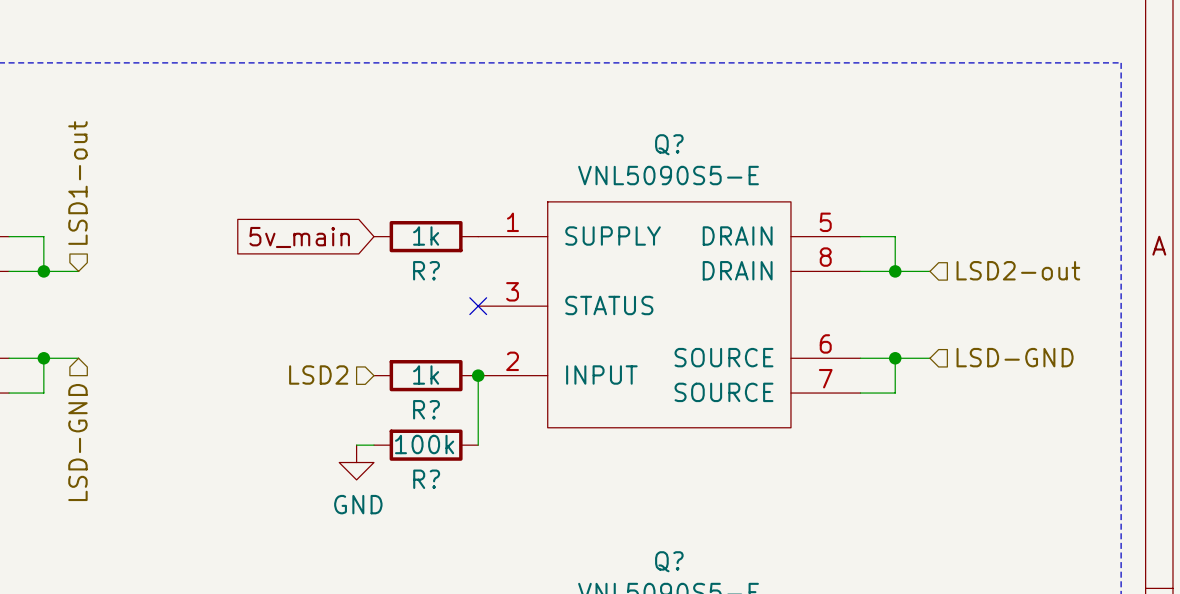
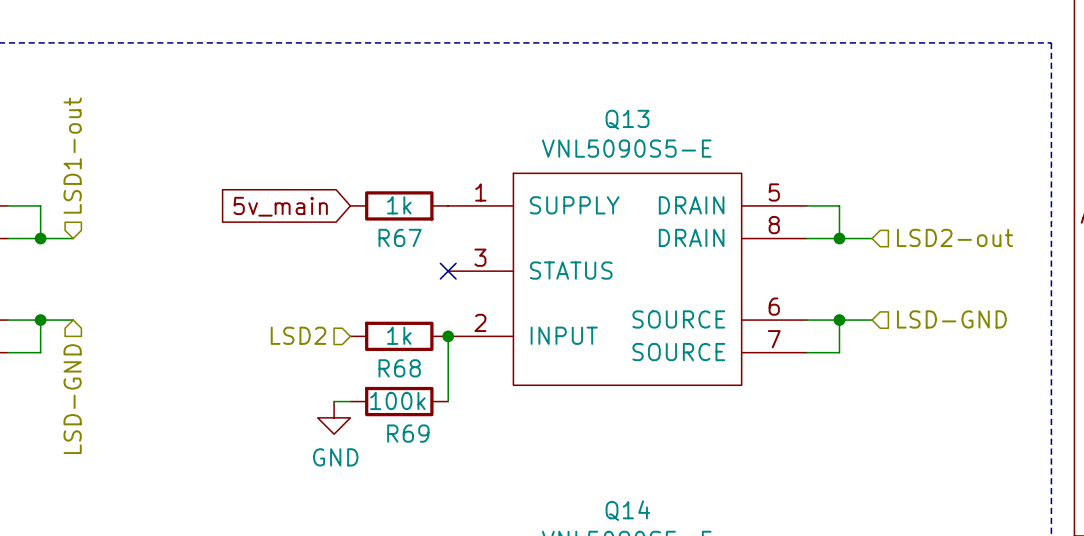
Q? name: Q? (669, 144) -> Q13 (627, 119)
R? name: R? (426, 270) -> R67 (400, 237)
R? name: R? (426, 409) -> R68 (399, 368)
R? name: R? (426, 479) -> R69 (408, 433)
Q? name: Q? (669, 561) -> Q14 (627, 510)

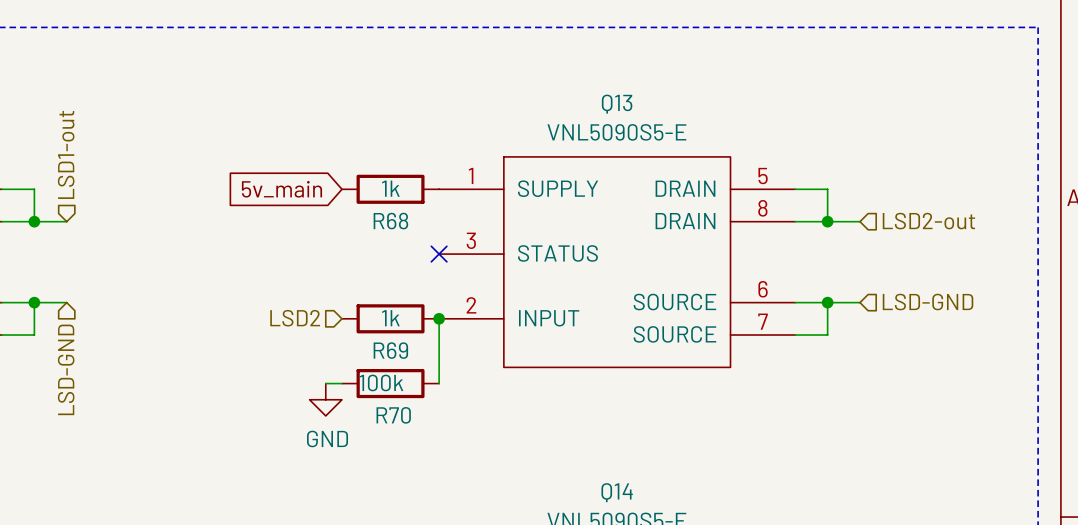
R67 name: R67 (400, 237) -> R68 (390, 221)
R68 name: R68 (399, 368) -> R69 (390, 350)
R69 name: R69 (408, 433) -> R70 (393, 415)

